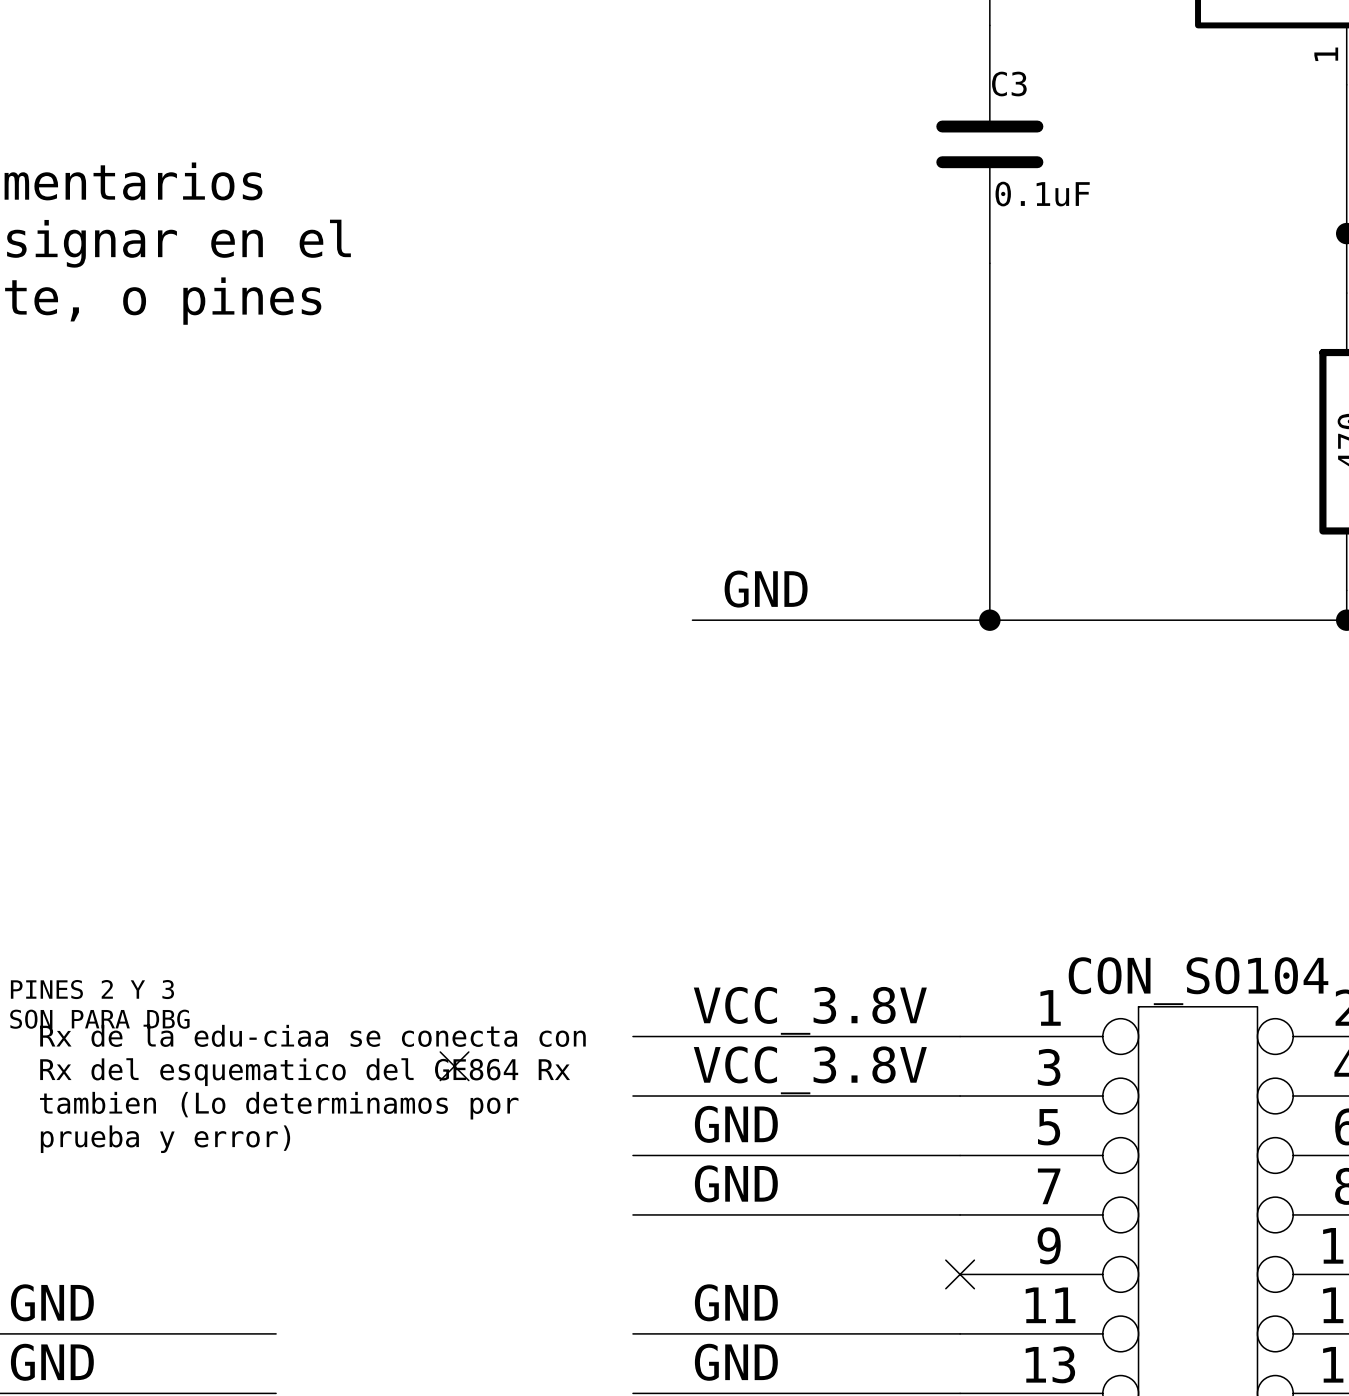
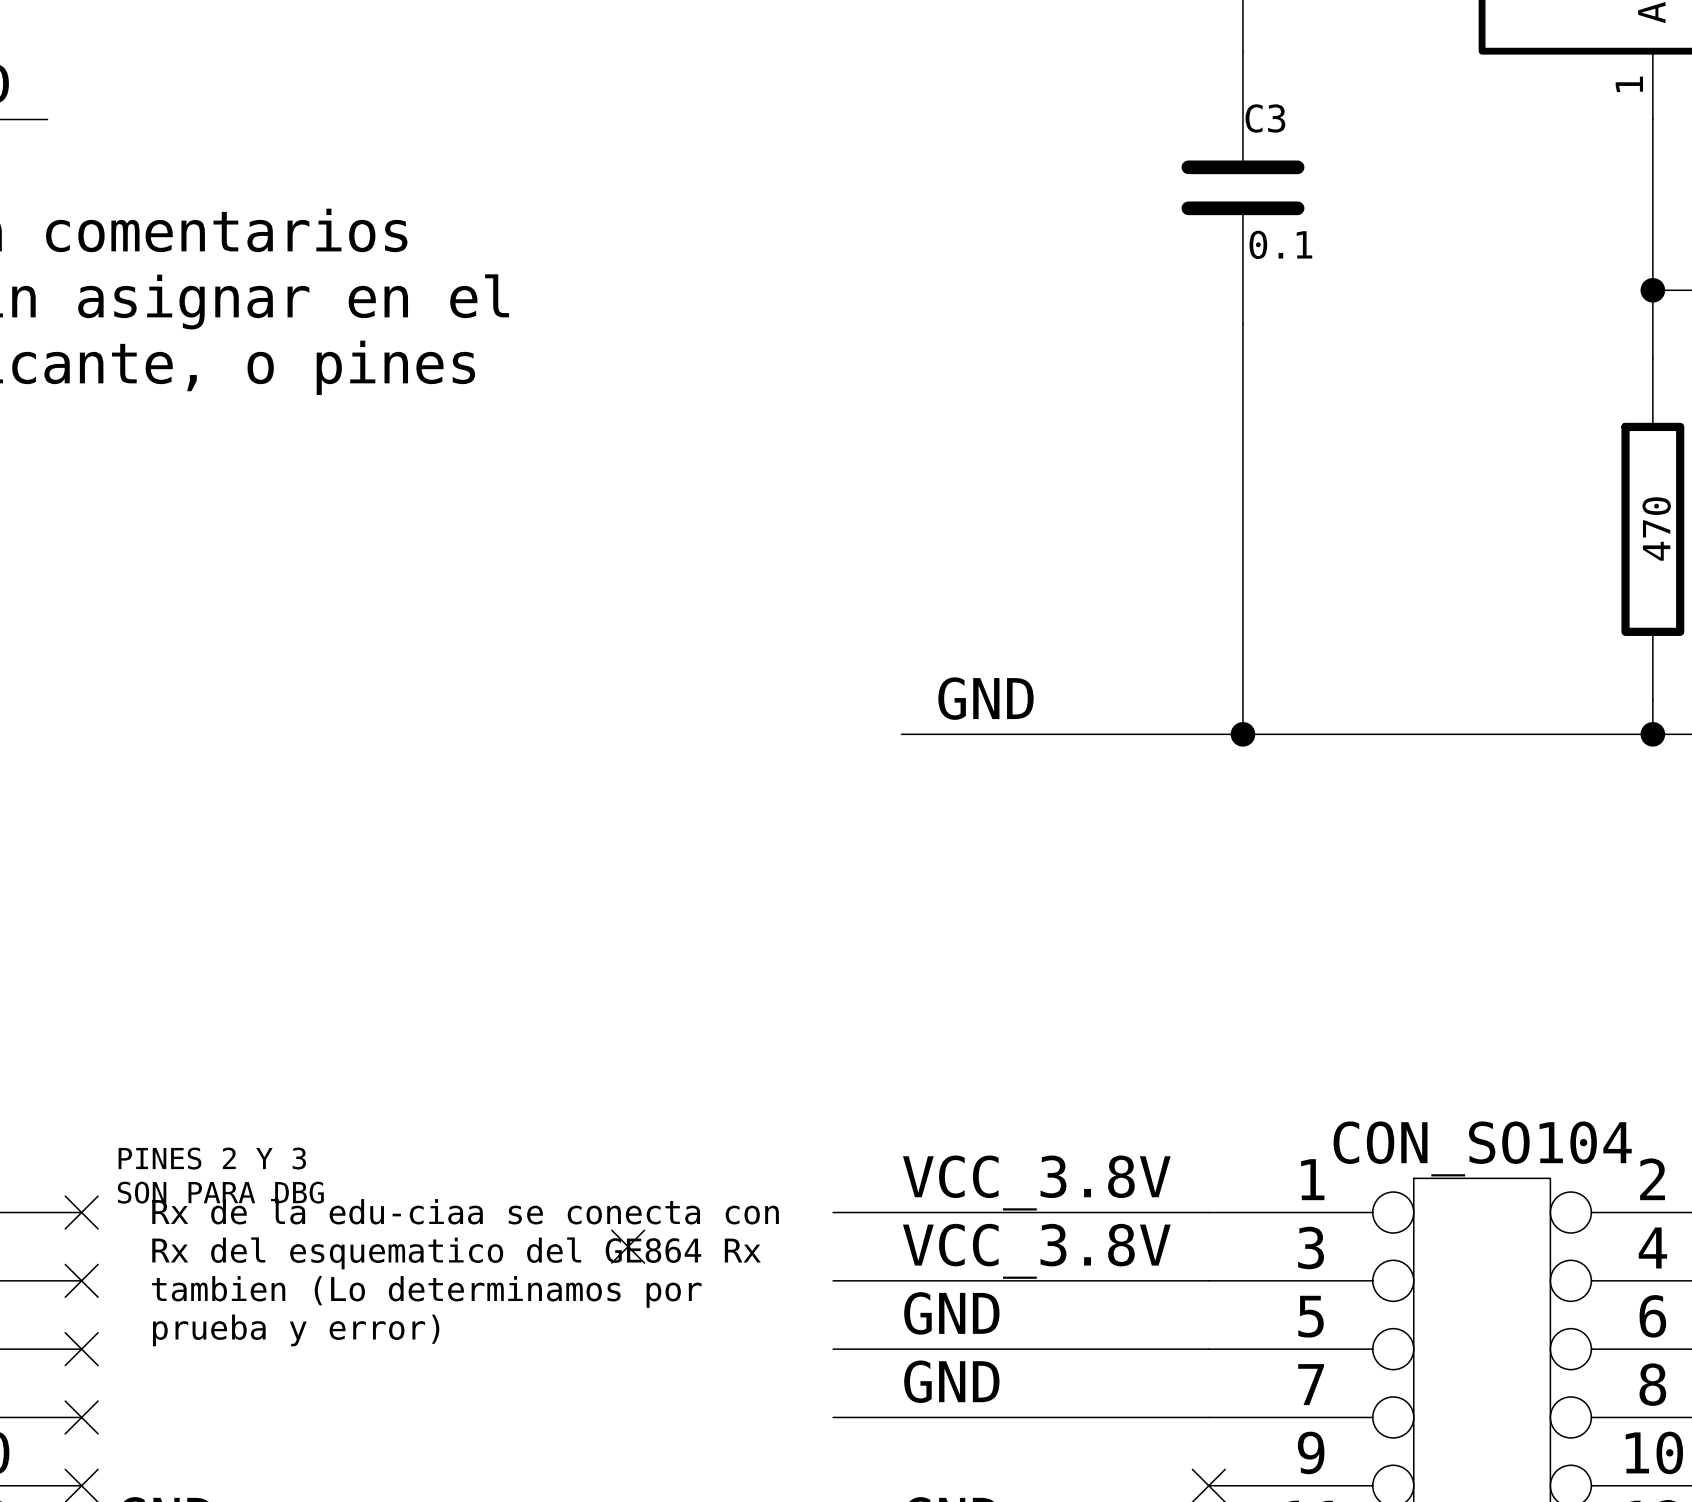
C3 value: 0.1uF (1042, 194) -> 0.1 (1280, 244)

